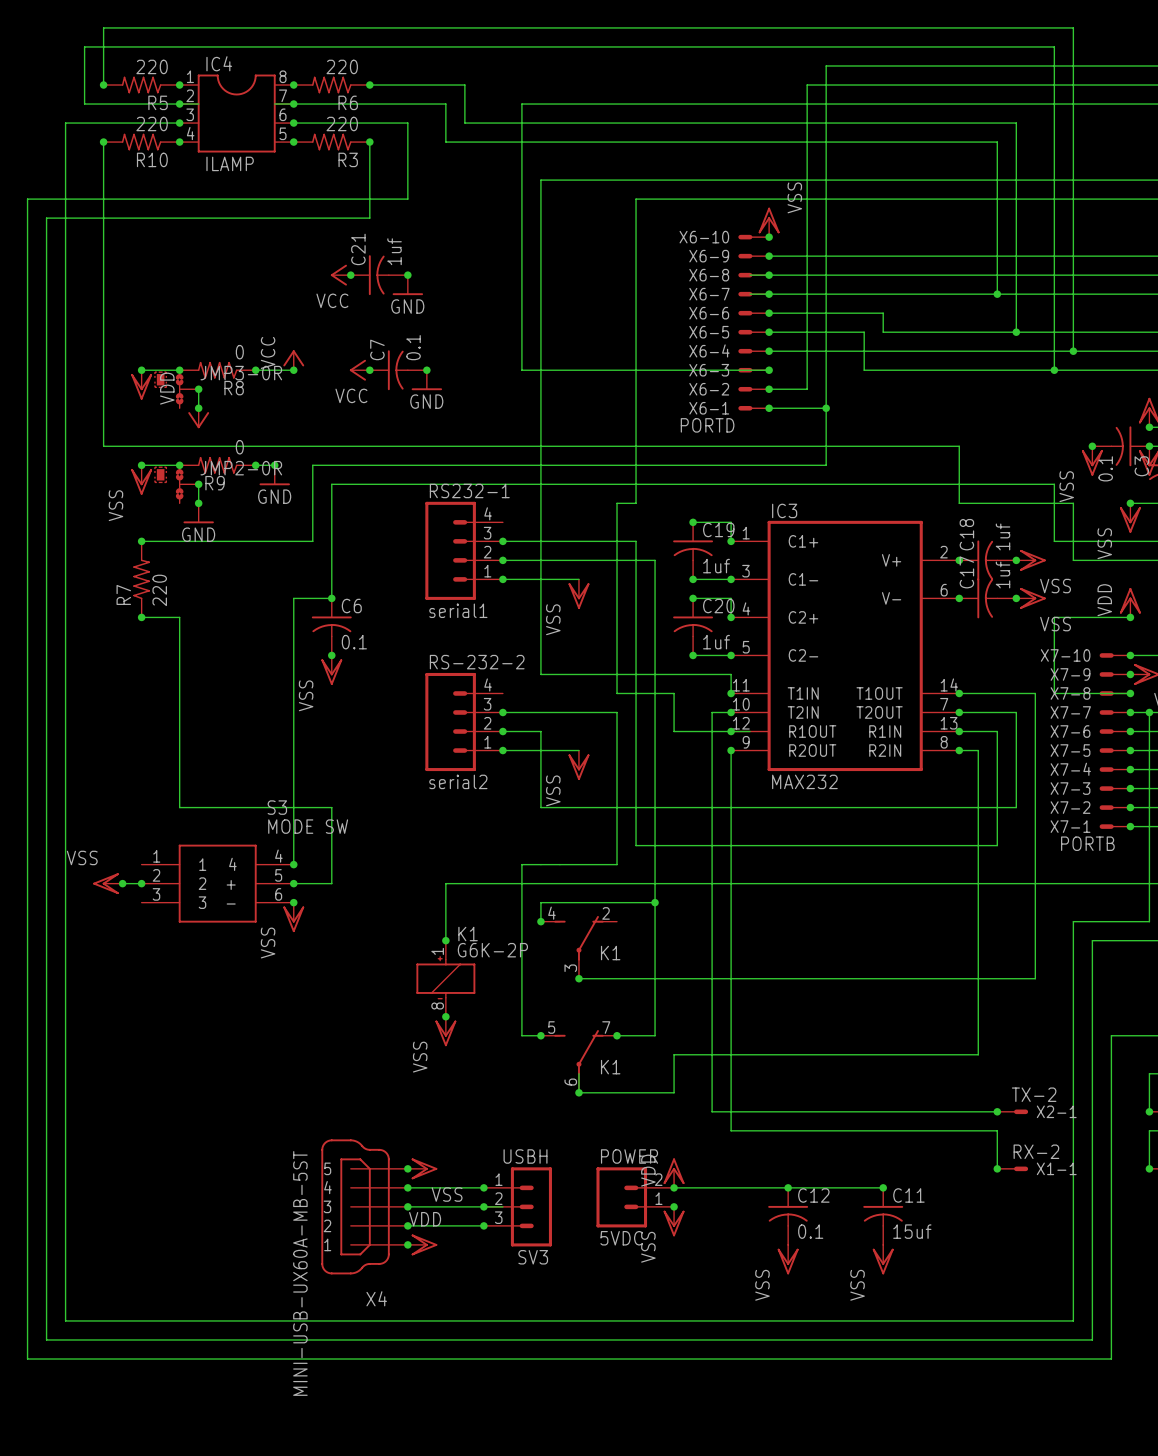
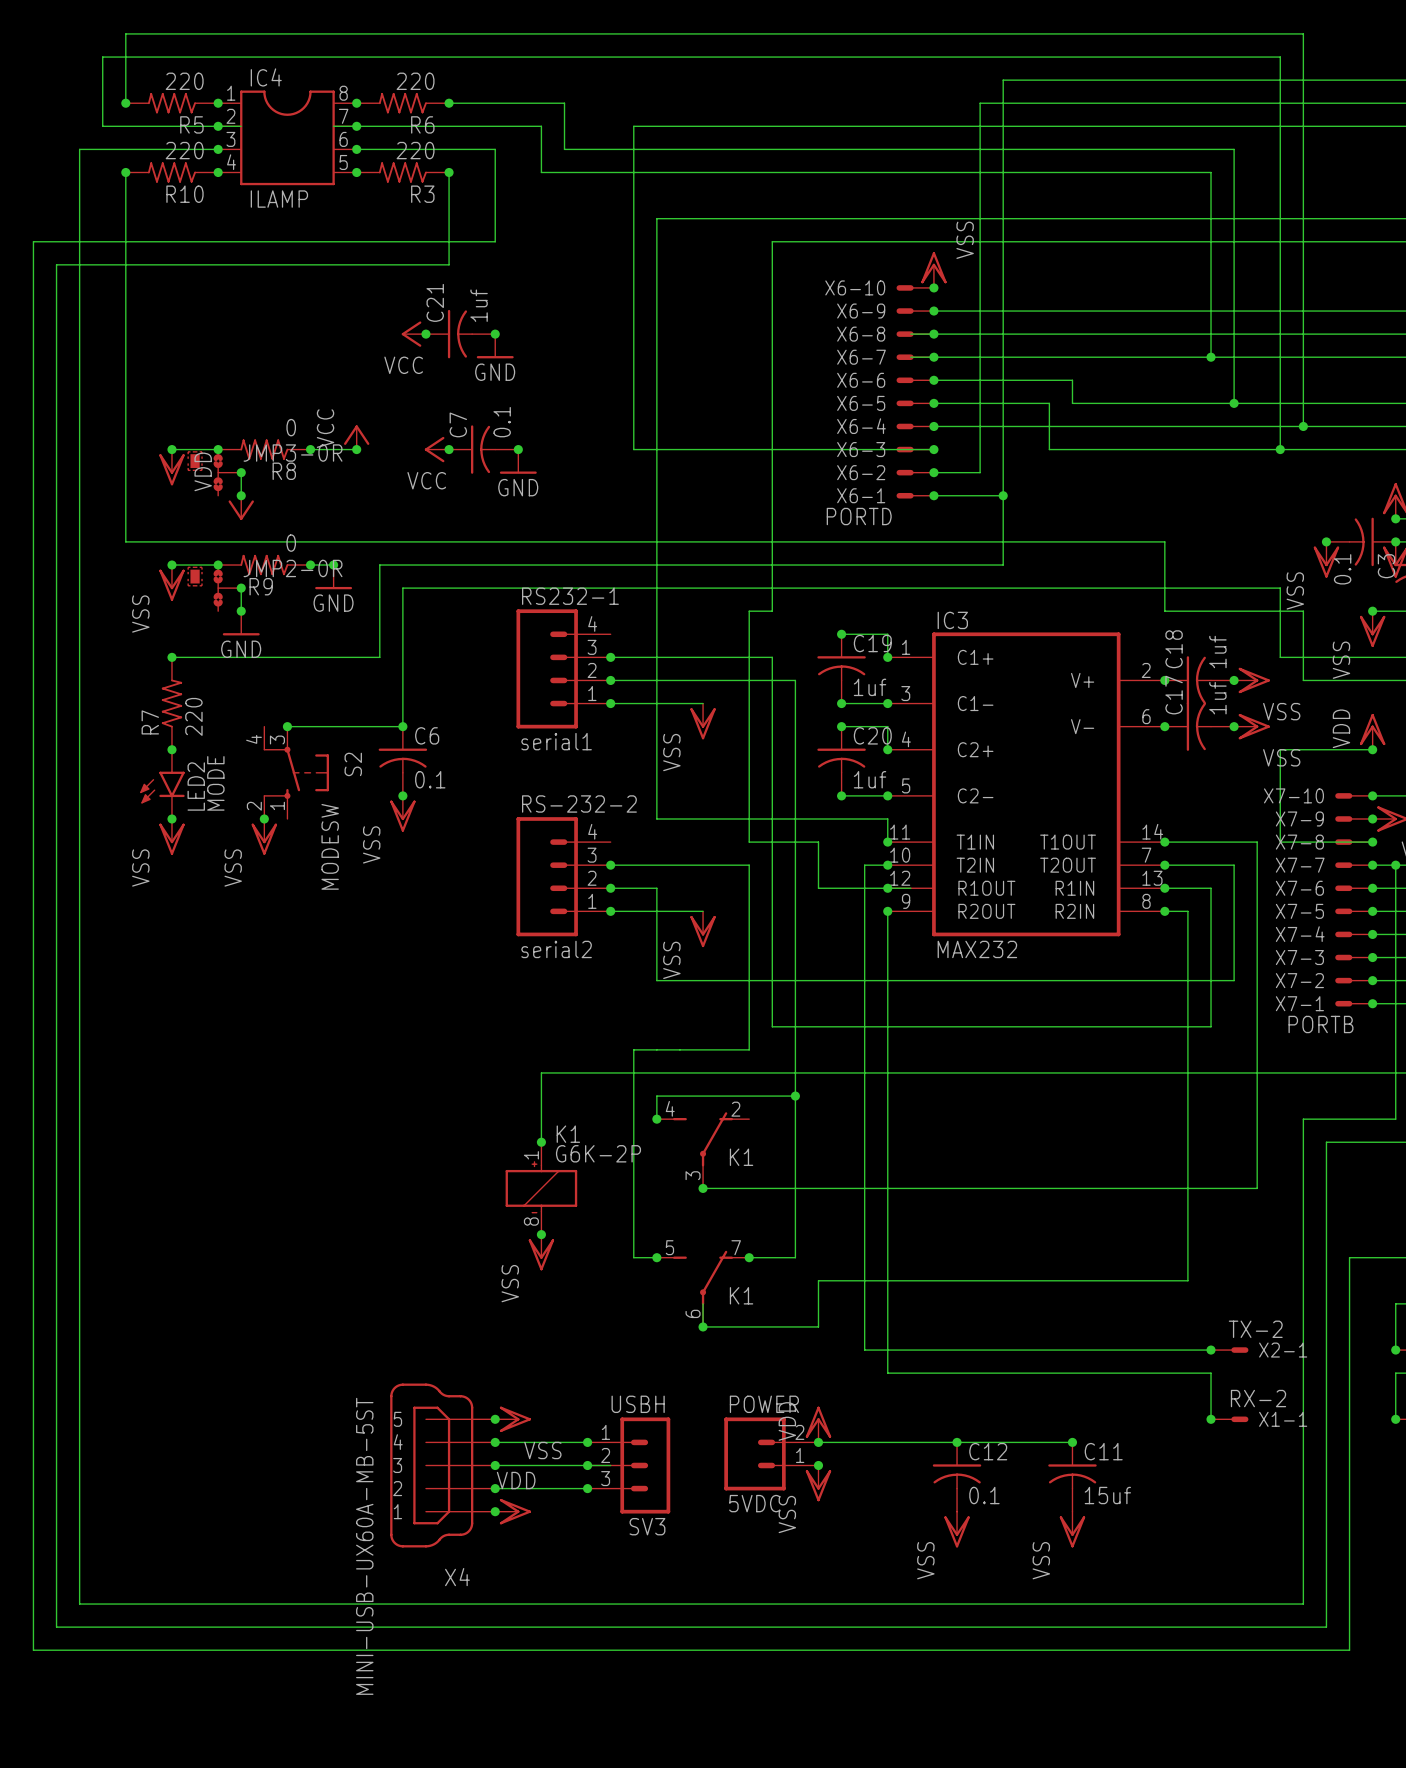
junction: none -> (287, 726)
wire: (293, 598) (293, 864) -> (356, 726) (287, 726)
wire: (141, 617) (179, 617) (179, 807) (331, 807) (331, 883) (293, 883) -> none
S2: none -> MODESW (296, 772)
LED2: none -> MODE (162, 784)
junction: none -> (171, 818)
junction: none -> (264, 818)
power symbol: none -> VSS (171, 836)
power symbol: none -> VSS (264, 836)
junction: (293, 864) -> none
power symbol: VSS (107, 883) -> none
wire: (122, 883) (141, 883) -> none
junction: (122, 883) -> none
junction: (141, 883) -> none
S3: MODE SW (217, 883) -> none
junction: (293, 883) -> none
junction: (293, 902) -> none
power symbol: VSS (293, 917) -> none

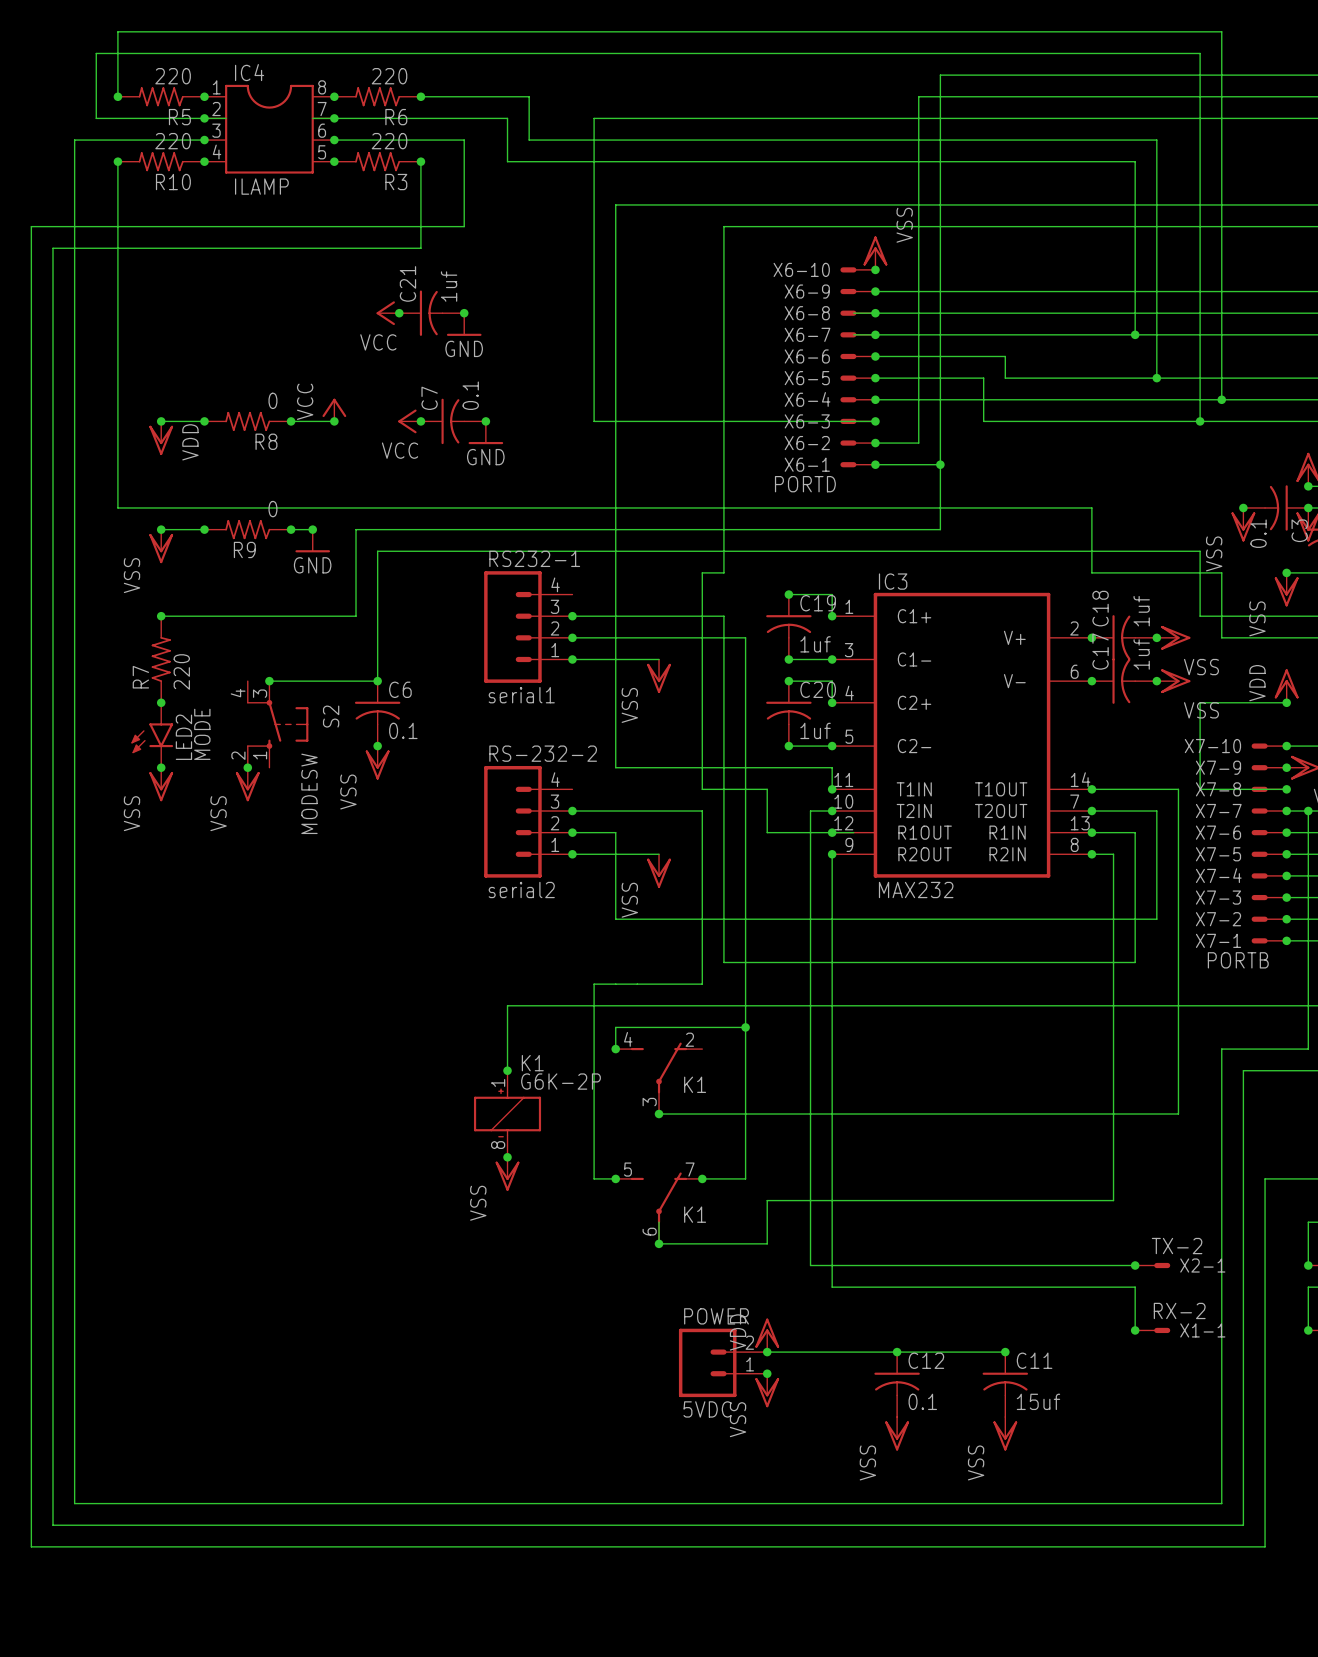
part: (195, 461) -> none
JMP3-0R: (227, 472) -> none
wire: (241, 472) (241, 495) -> none
junction: (241, 472) -> none
junction: (241, 495) -> none
power symbol: (241, 507) -> none
part: (195, 576) -> none
JMP2-0R: (227, 588) -> none
wire: (241, 588) (241, 611) -> none
junction: (241, 588) -> none
junction: (241, 611) -> none
power symbol: GND (241, 623) -> none
junction: (495, 1419) -> none
power symbol: VSS (513, 1419) -> none
wire: (495, 1442) (587, 1442) -> none
junction: (495, 1442) -> none
junction: (587, 1442) -> none
X4: MINI-USB-UX60A-MB-5ST (442, 1465) -> none
wire: (495, 1465) (610, 1465) -> none
junction: (495, 1465) -> none
junction: (587, 1465) -> none
SV3: USBH (628, 1465) -> none
wire: (495, 1488) (587, 1488) -> none
junction: (495, 1488) -> none
junction: (587, 1488) -> none
junction: (495, 1511) -> none
power symbol: VDD (513, 1511) -> none

